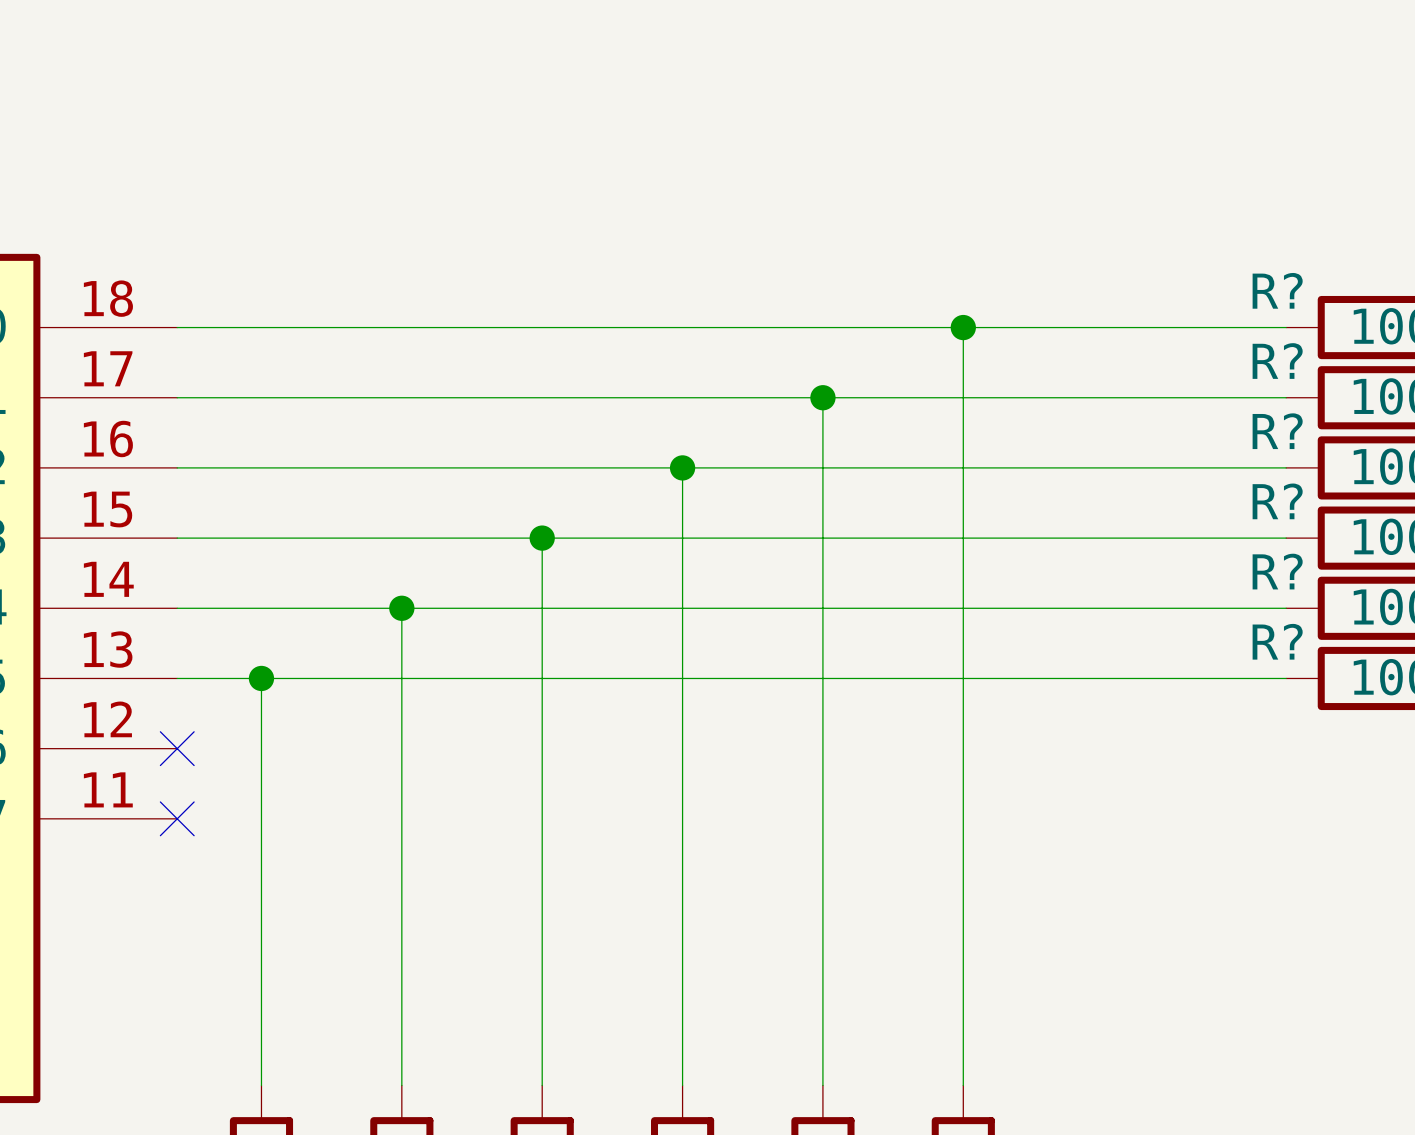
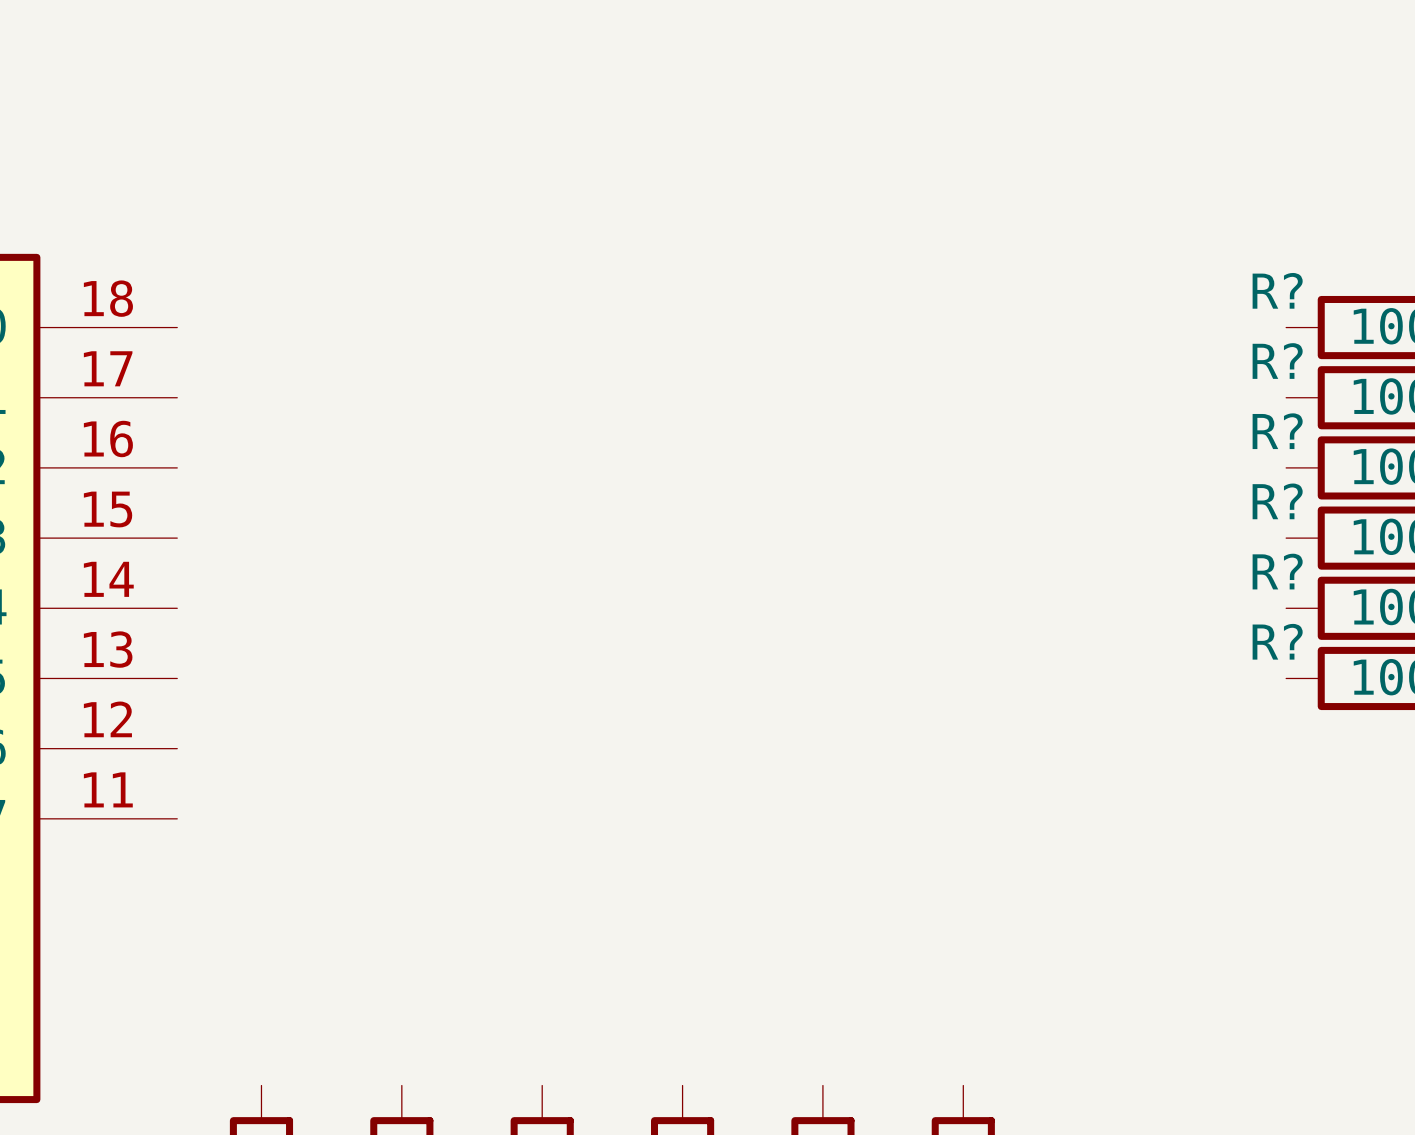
wire: (177, 327) (1286, 327) -> none
wire: (963, 327) (963, 1085) -> none
junction: (963, 327) -> none
wire: (177, 397) (1286, 397) -> none
wire: (822, 397) (822, 1085) -> none
junction: (822, 397) -> none
wire: (177, 467) (1286, 467) -> none
wire: (682, 467) (682, 1085) -> none
junction: (682, 467) -> none
wire: (177, 538) (1286, 538) -> none
wire: (542, 538) (542, 1085) -> none
junction: (542, 538) -> none
wire: (177, 608) (1286, 608) -> none
wire: (401, 608) (401, 1085) -> none
junction: (401, 608) -> none
wire: (177, 678) (1286, 678) -> none
wire: (261, 678) (261, 1085) -> none
junction: (261, 678) -> none
no-connect mark: (177, 748) -> none
no-connect mark: (177, 818) -> none

